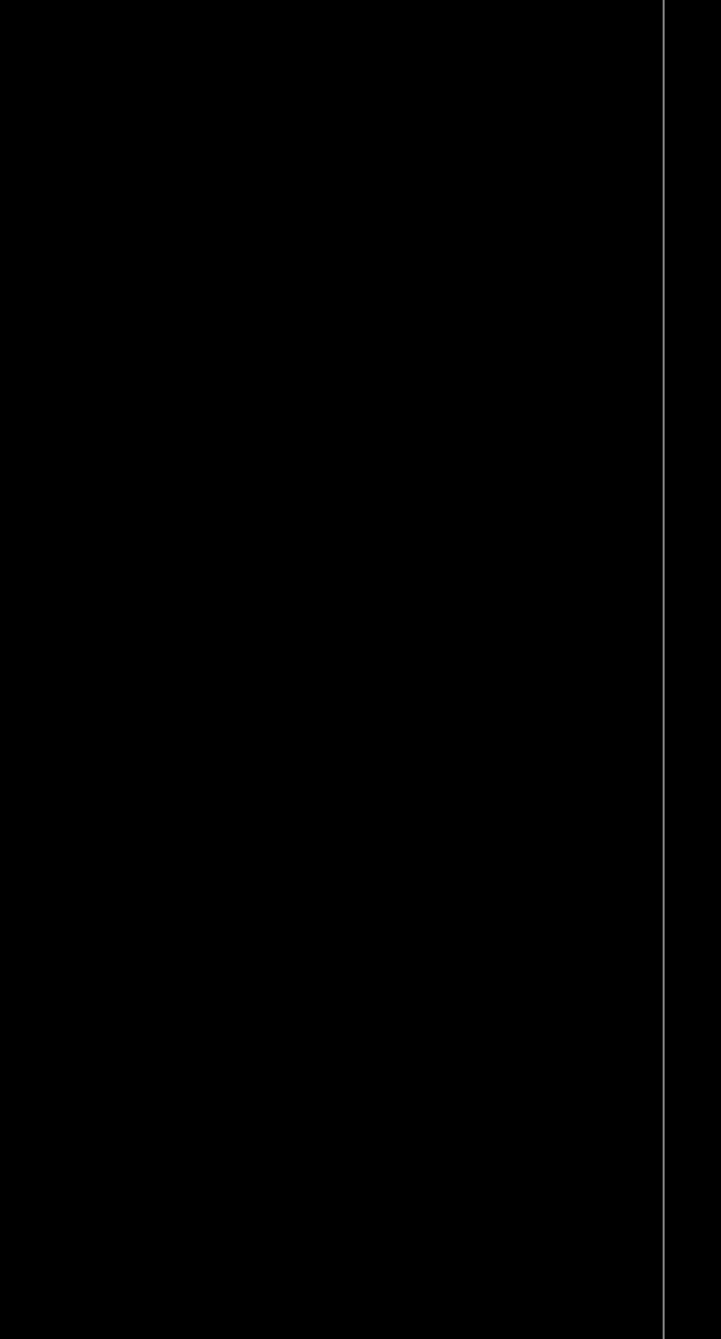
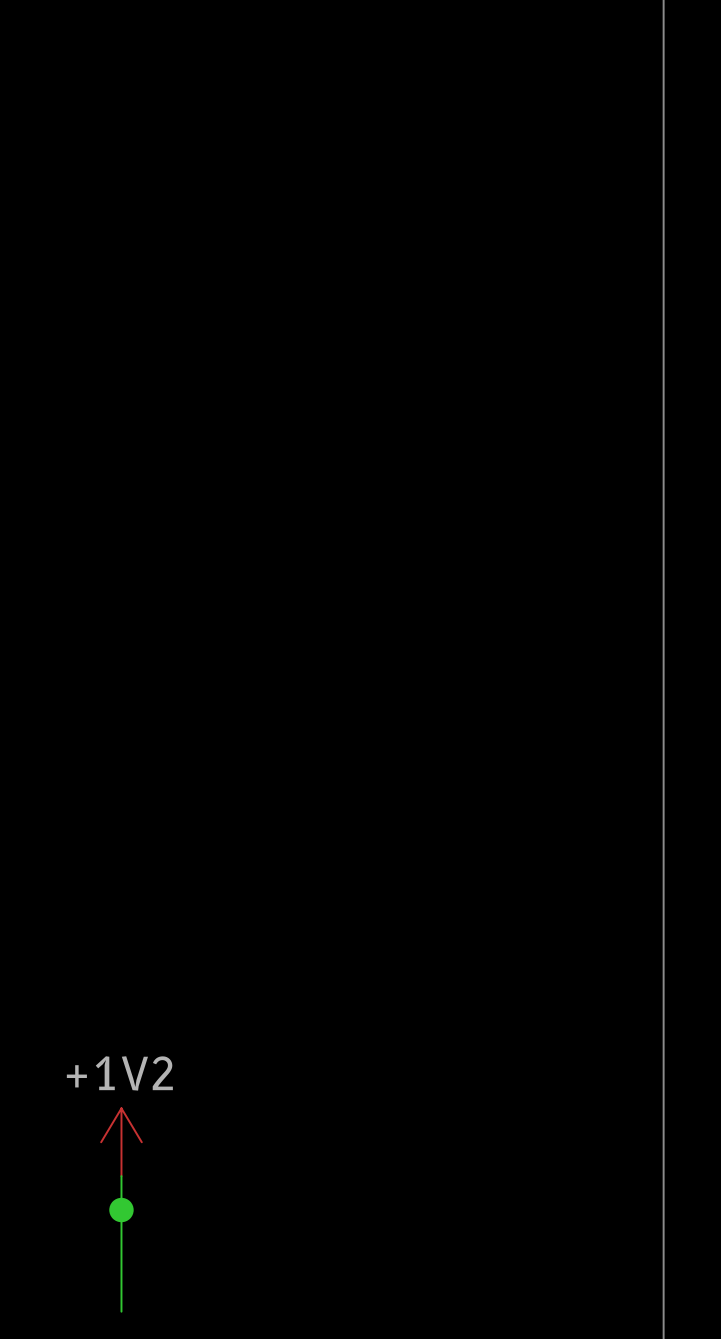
power symbol: none -> +1V2 (121, 1142)
wire: none -> (121, 1176) (121, 1311)
junction: none -> (121, 1210)

